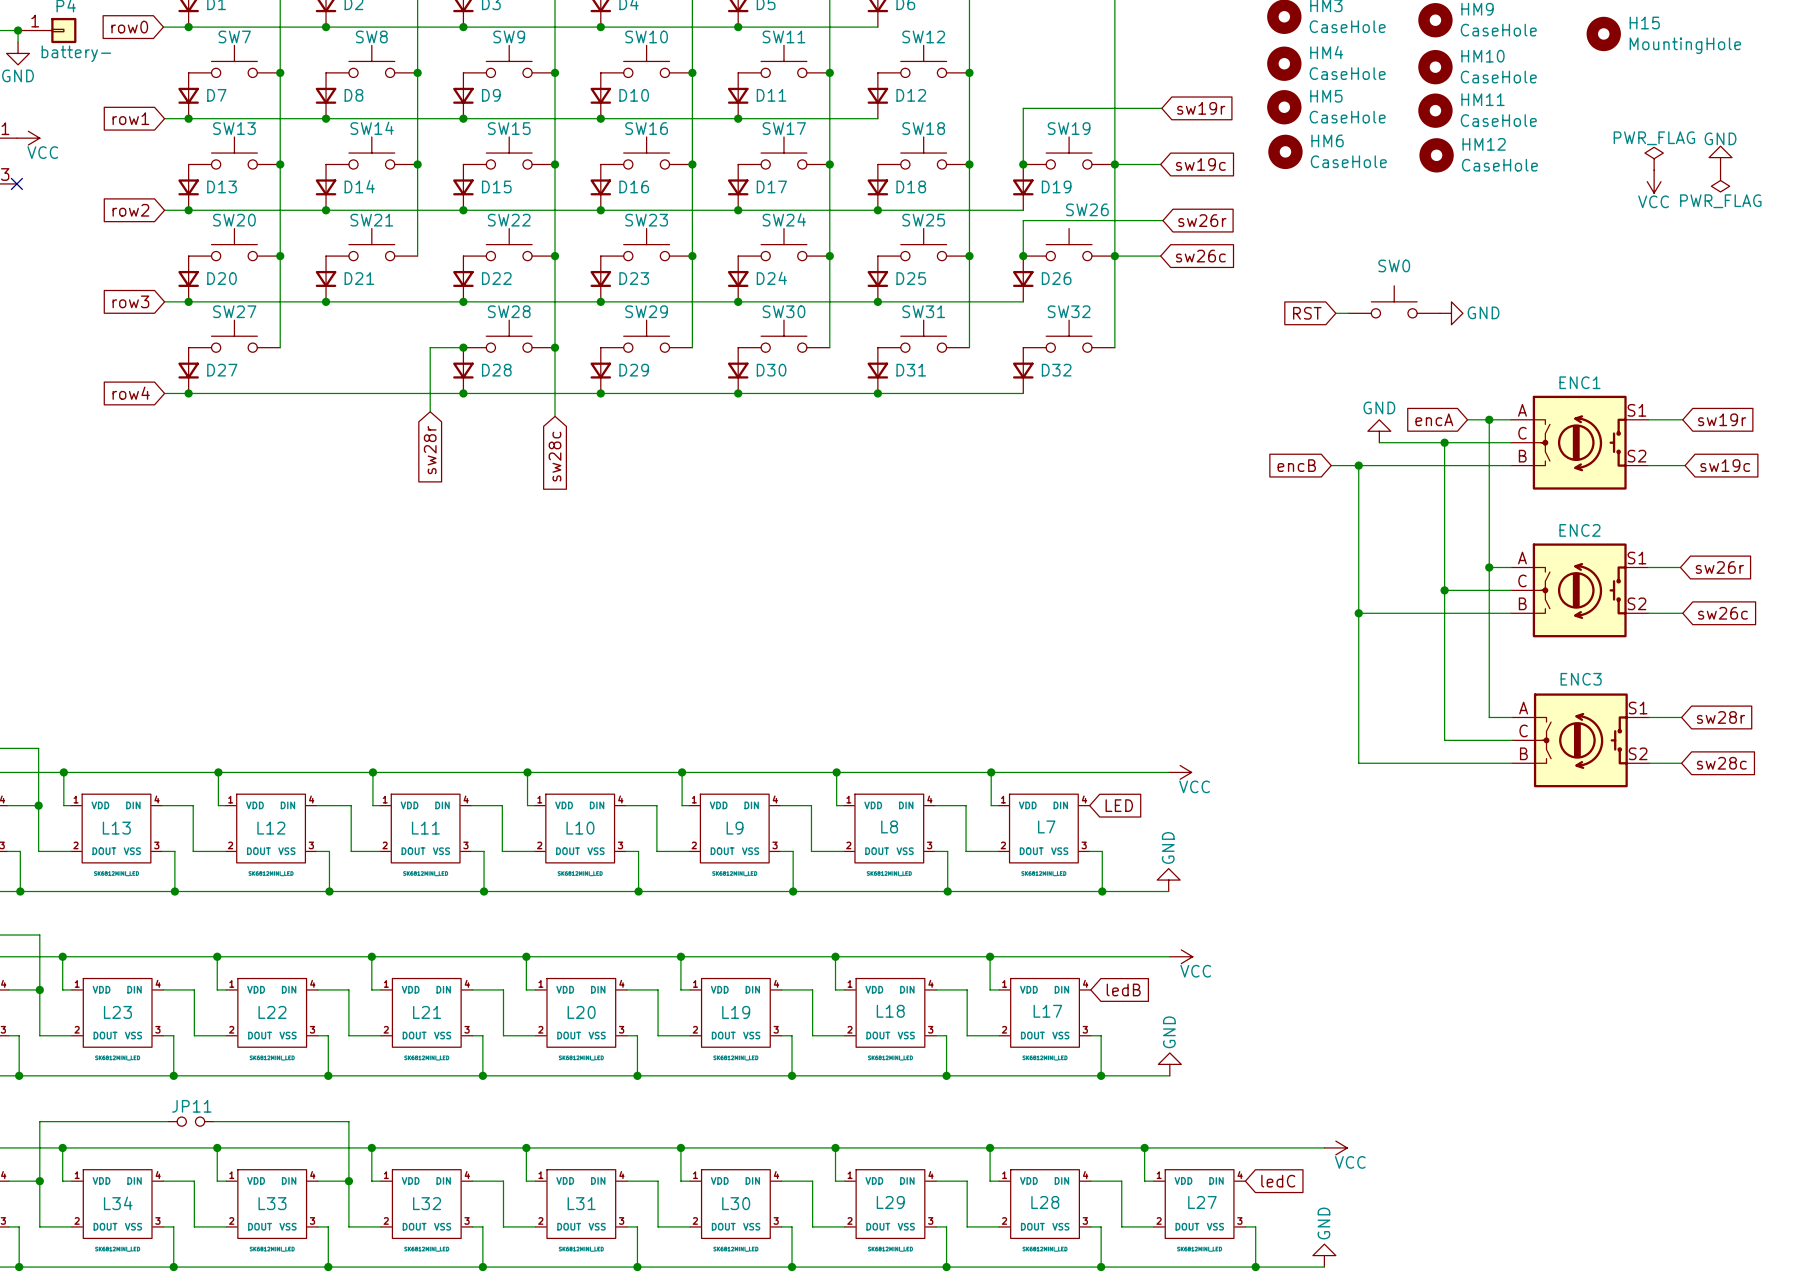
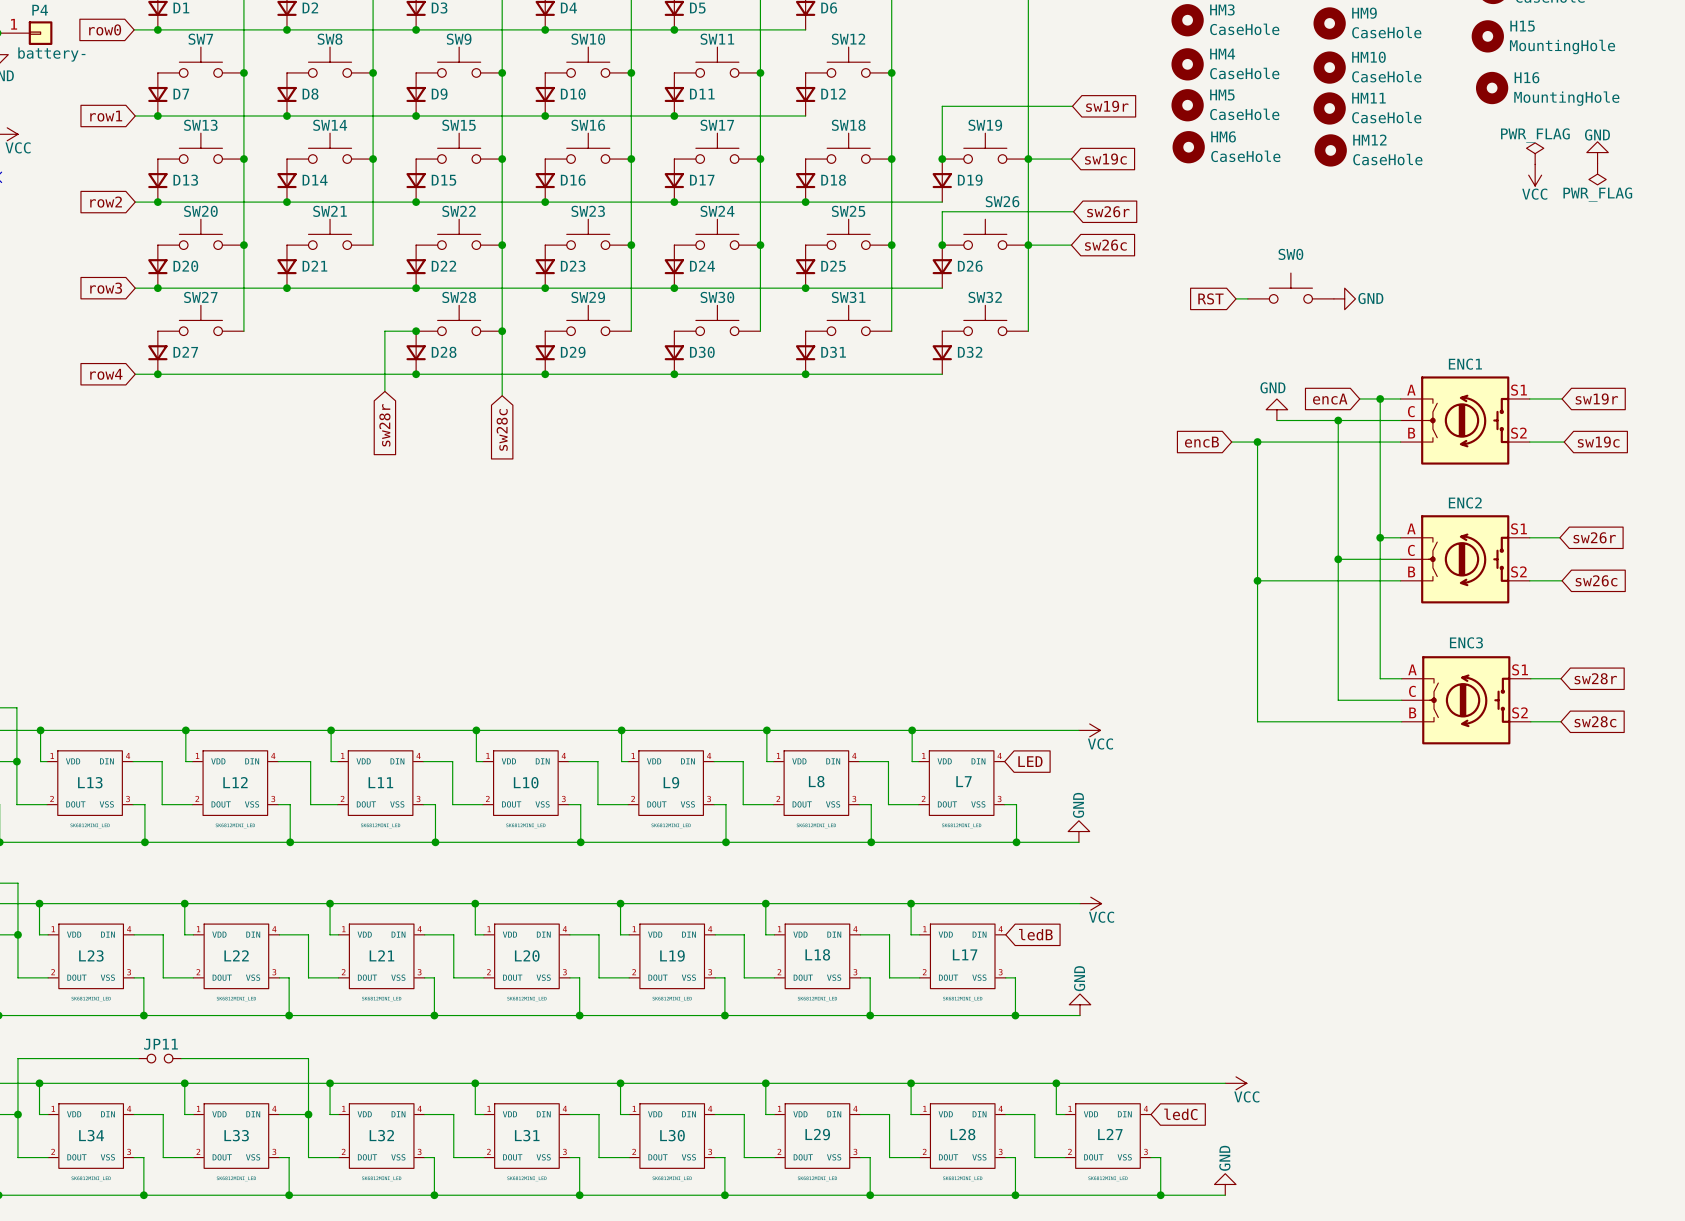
H16: none -> MountingHole (1492, 88)

